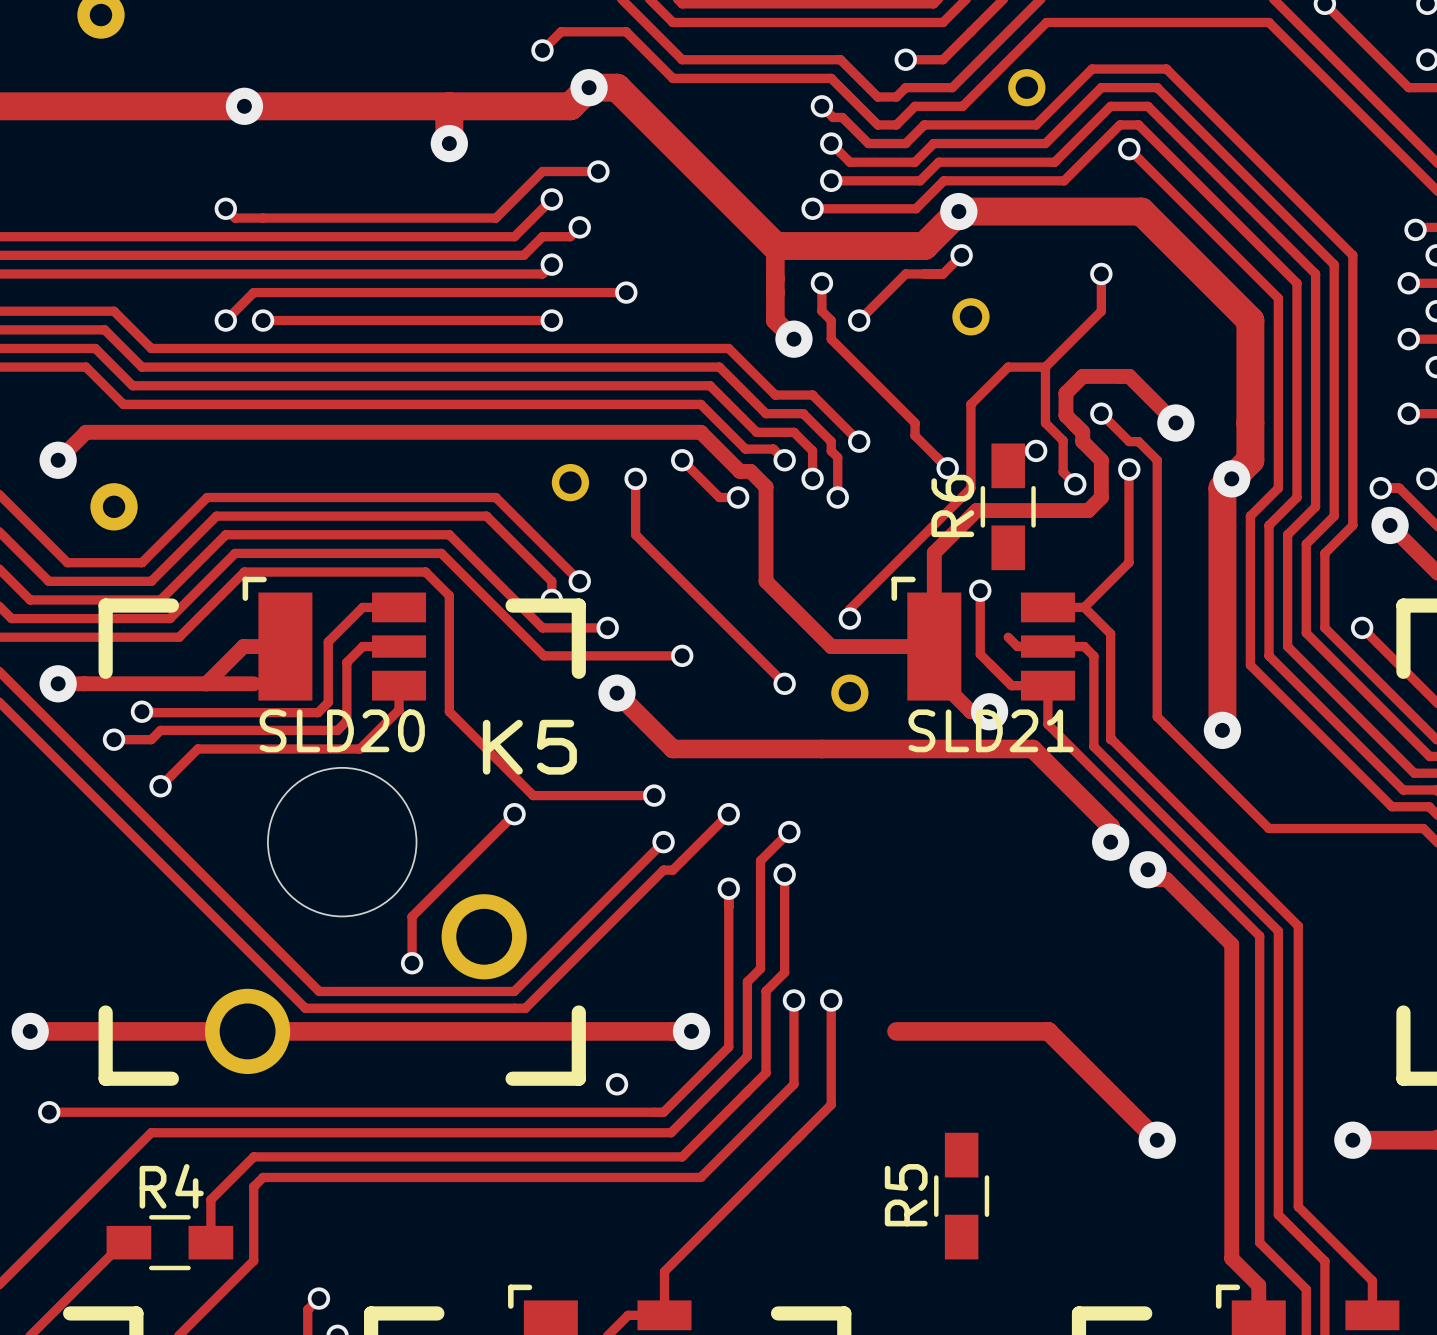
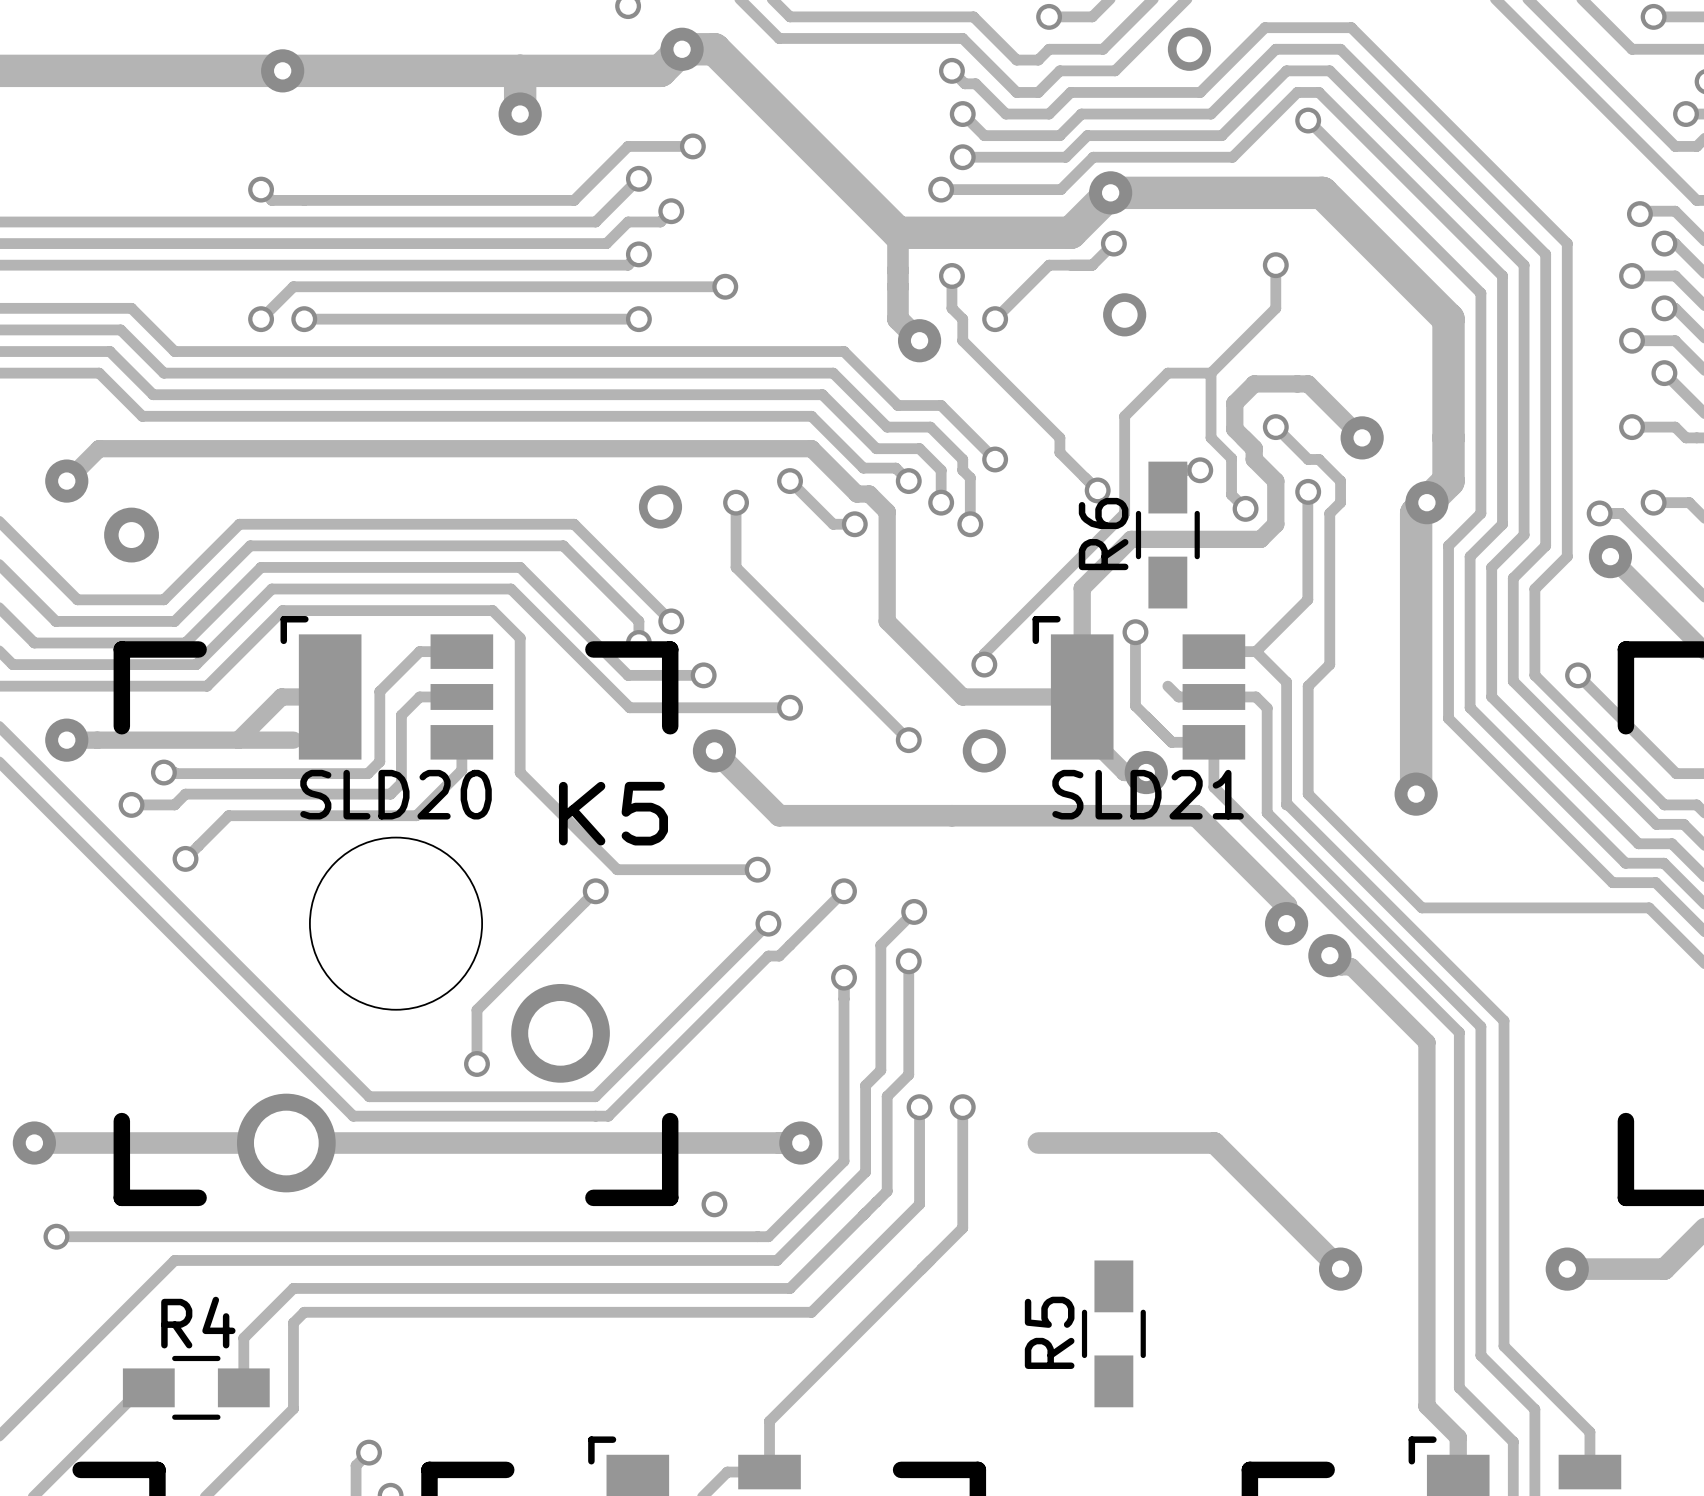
track: (1157, 478) (1157, 716) (1269, 828) -> (1340, 502) (1329, 513) (1329, 664) (1308, 686) (1308, 794) (1421, 907) (1470, 907)

